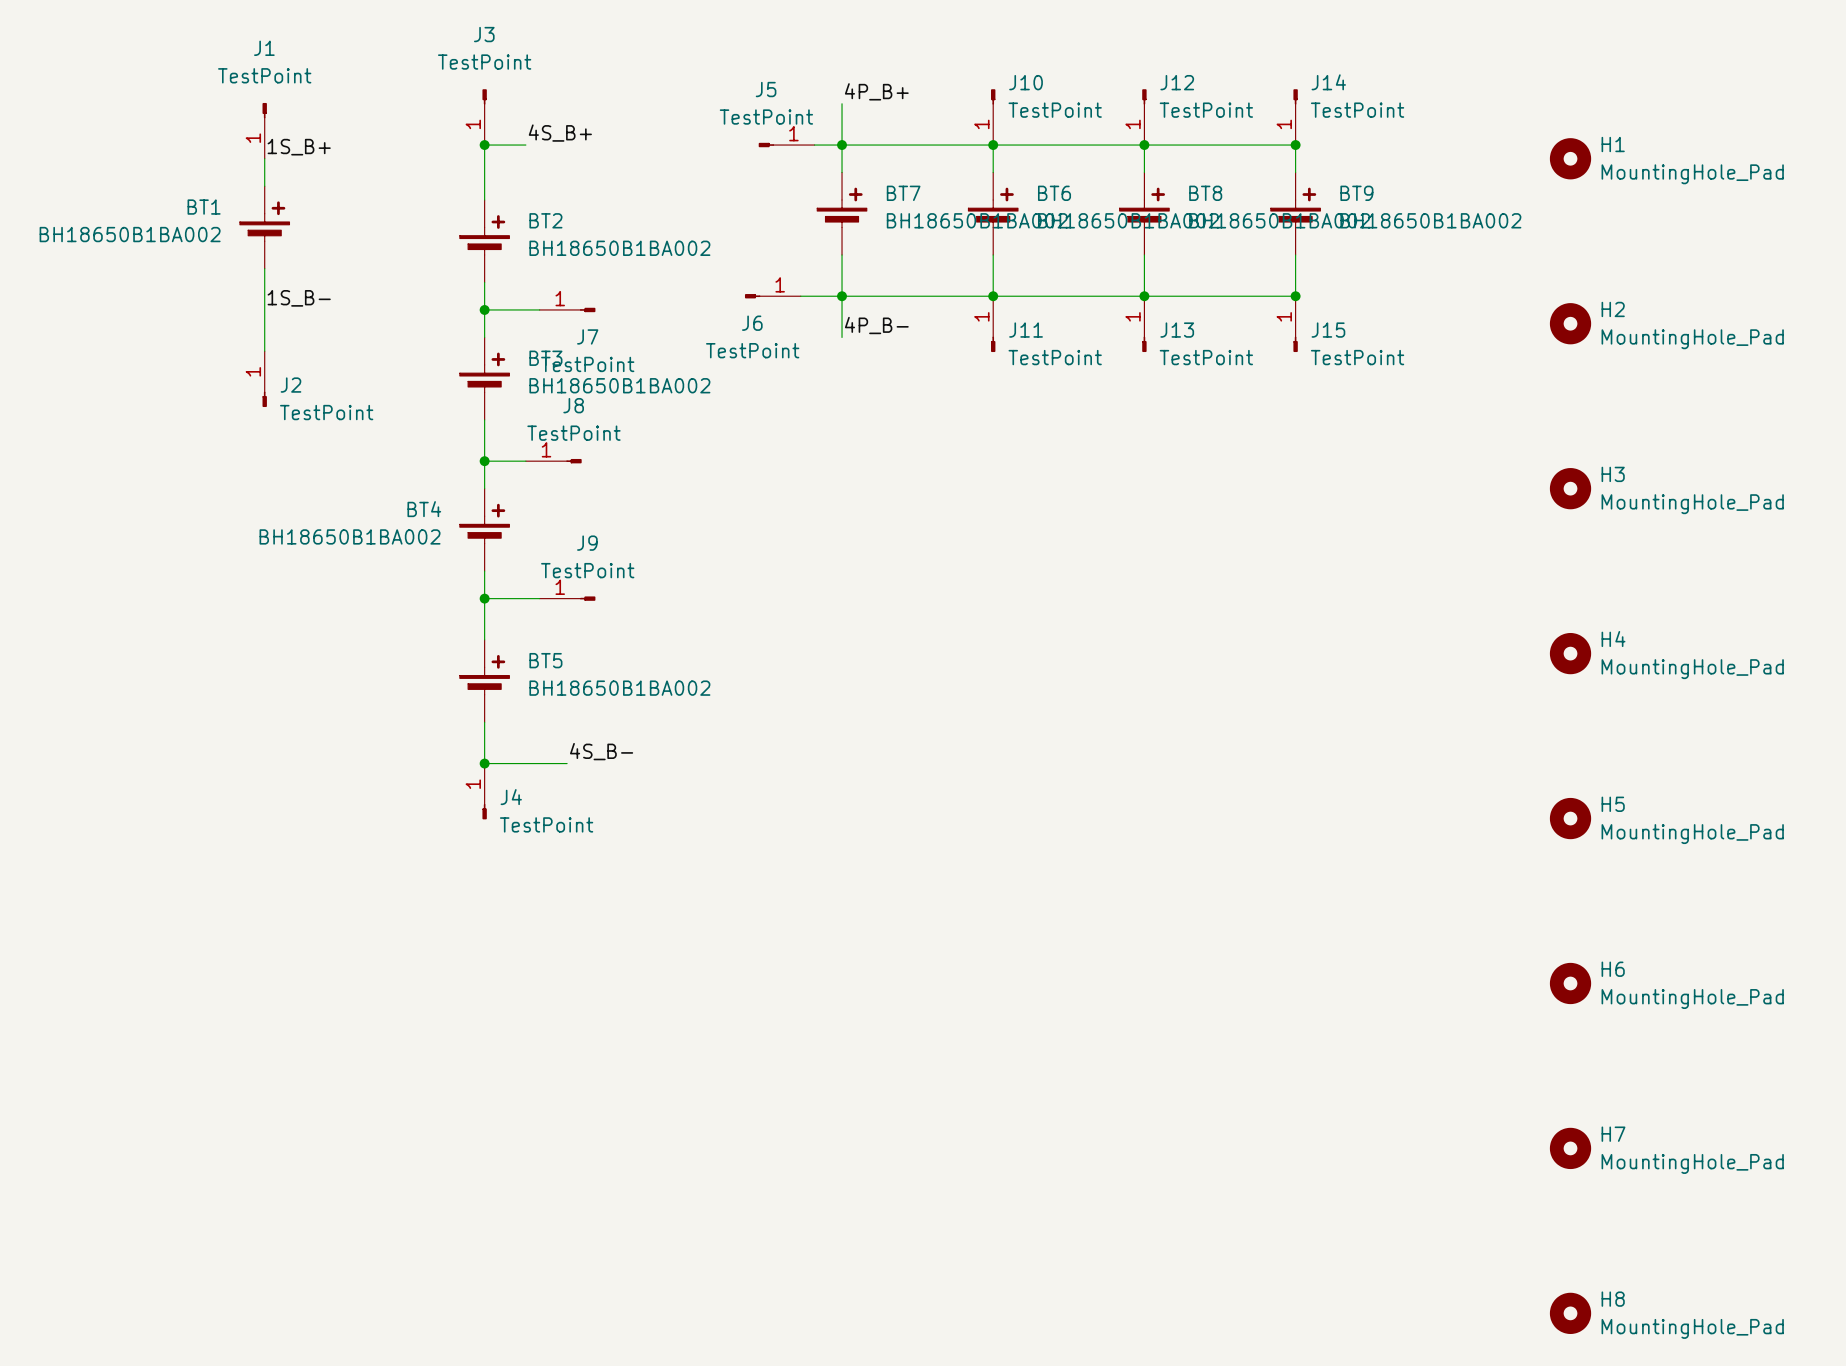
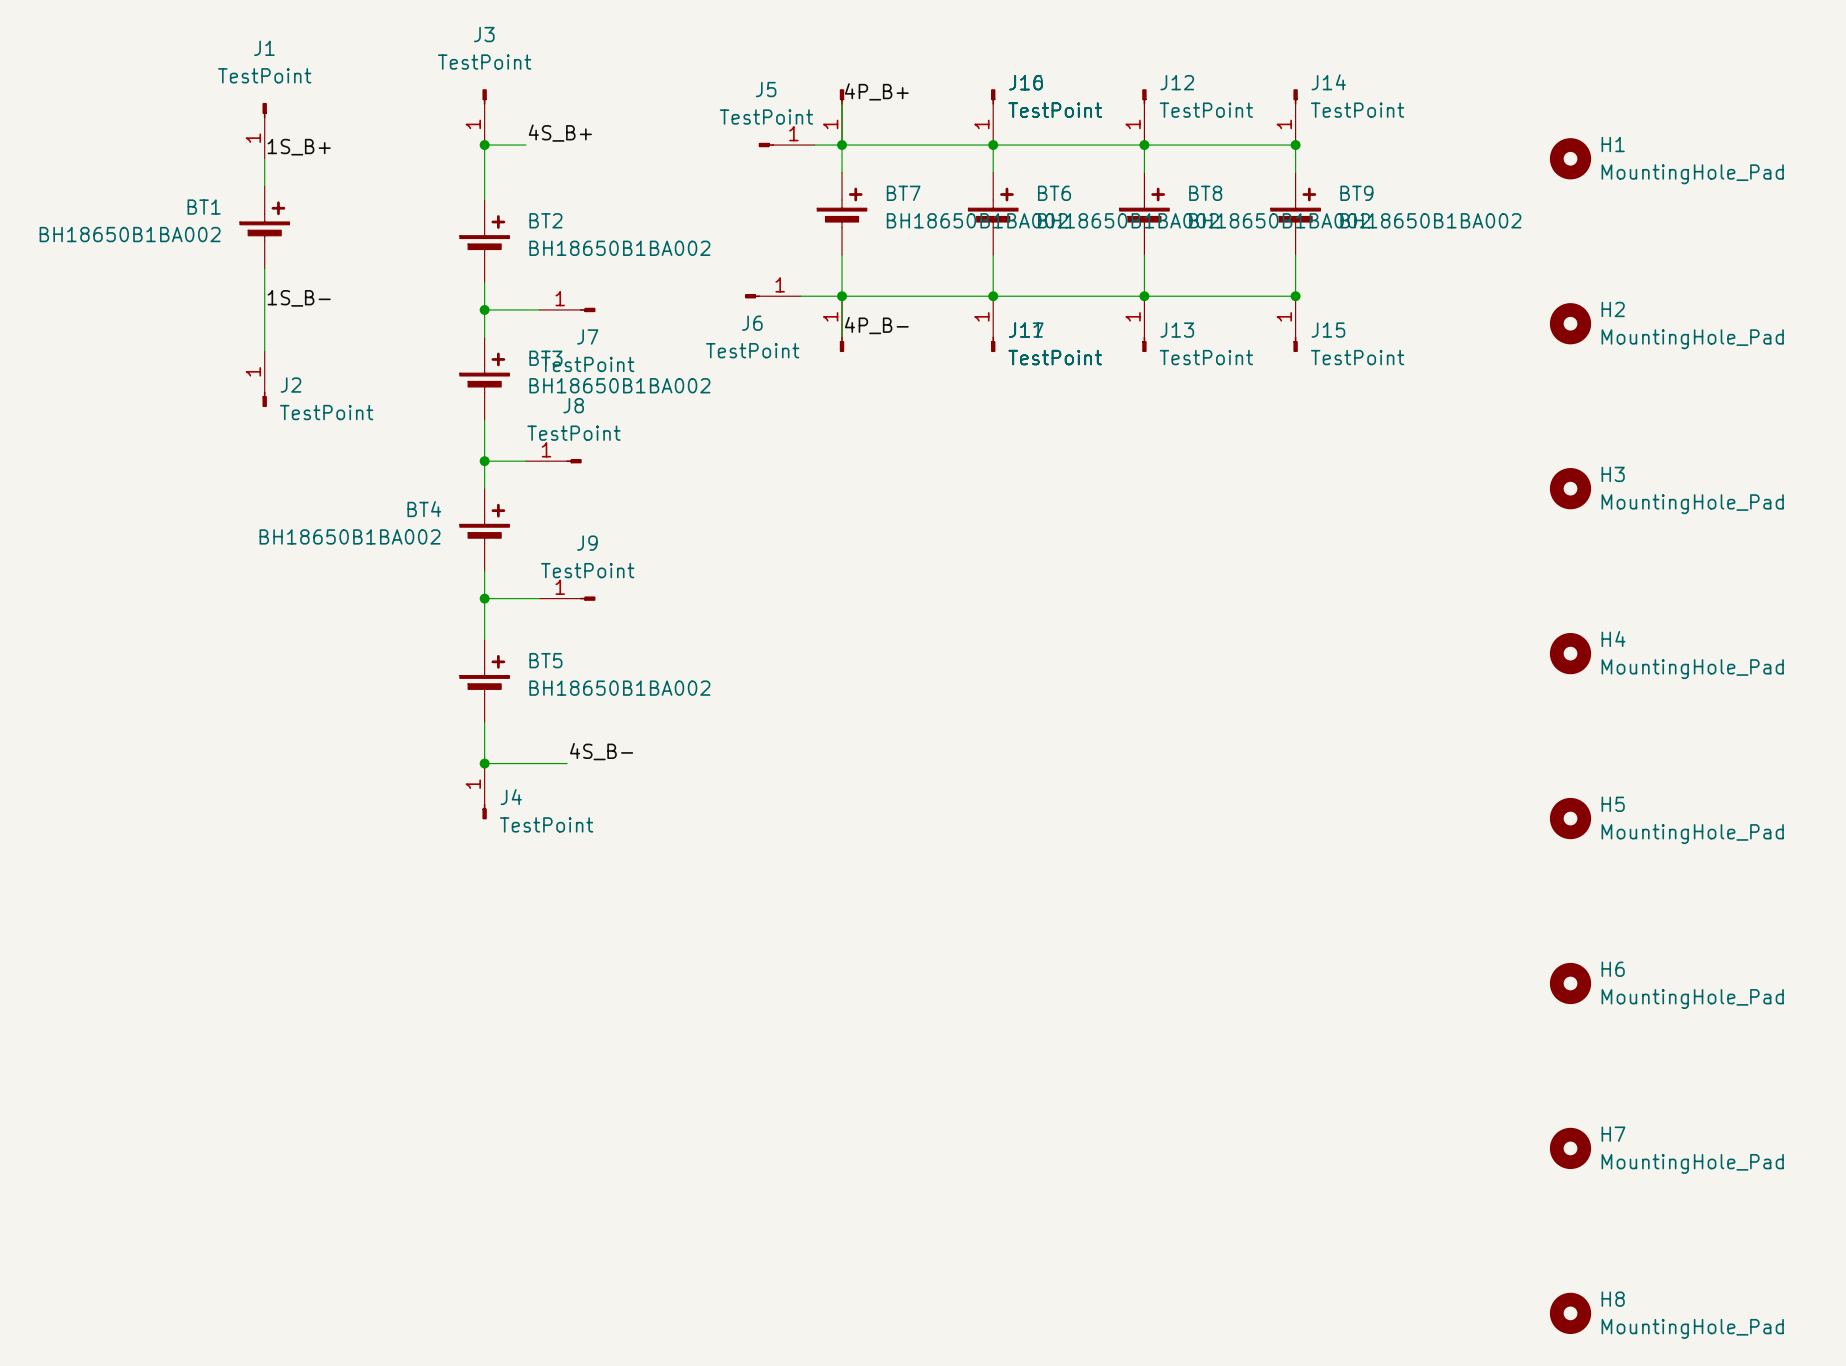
part: none -> TestPoint (842, 117)
part: none -> TestPoint (842, 324)

